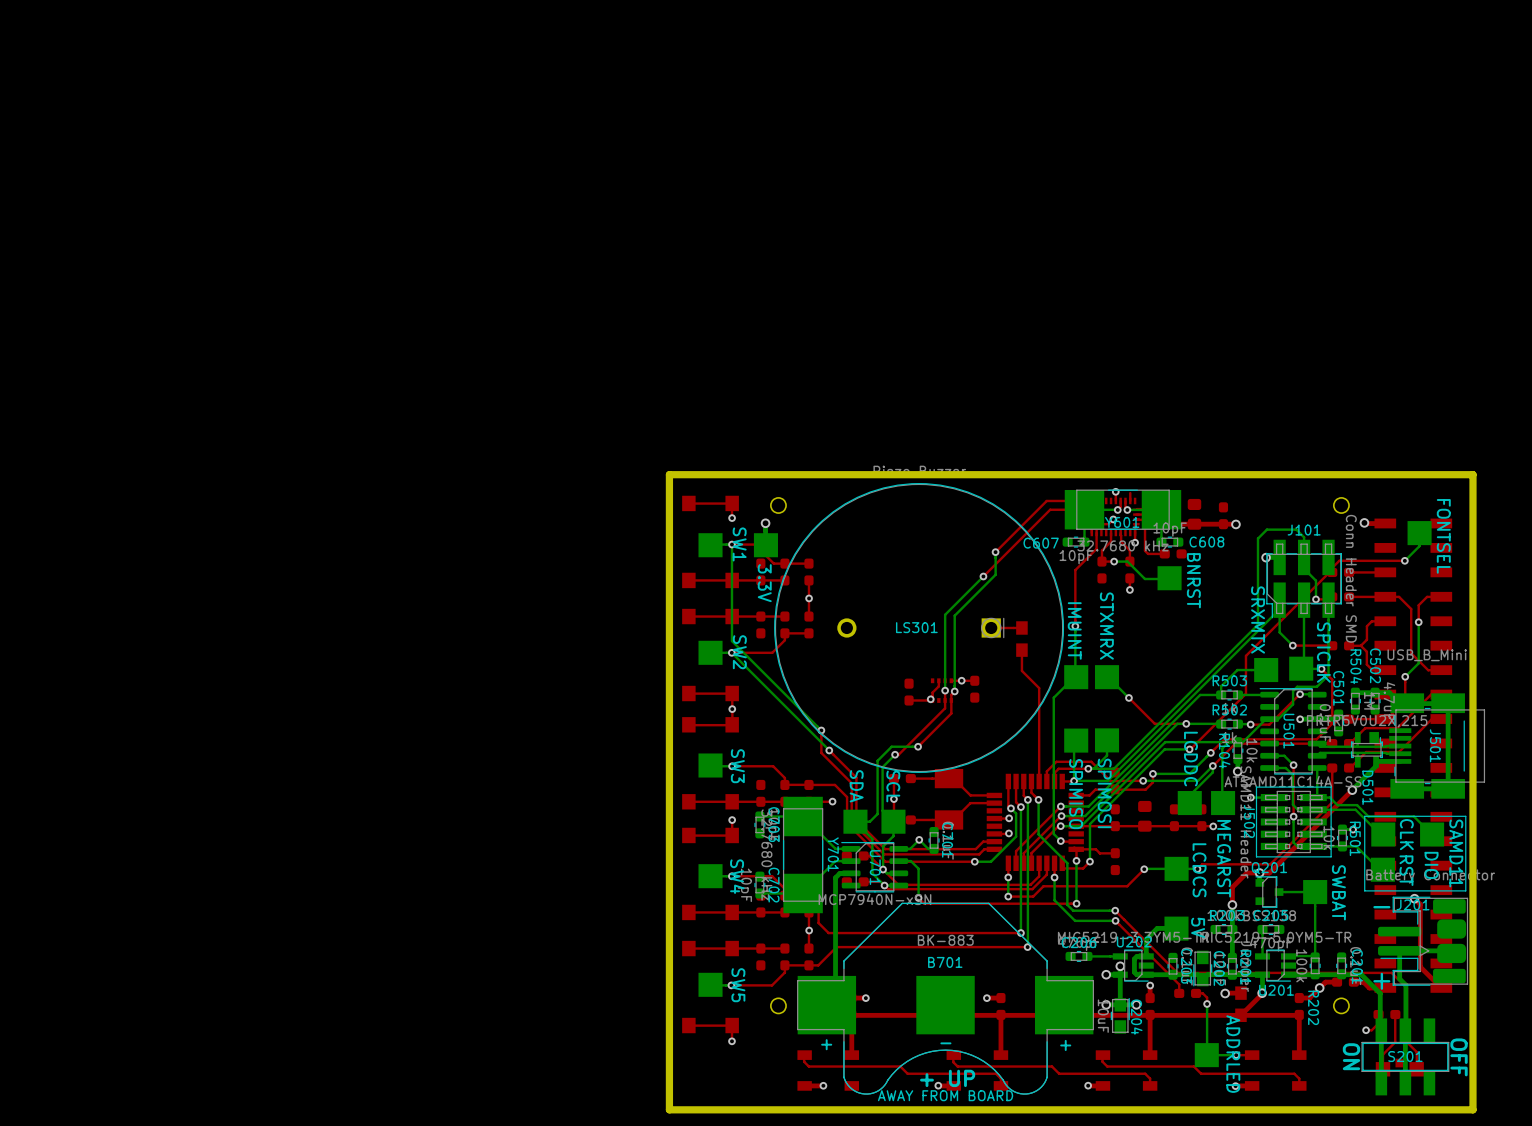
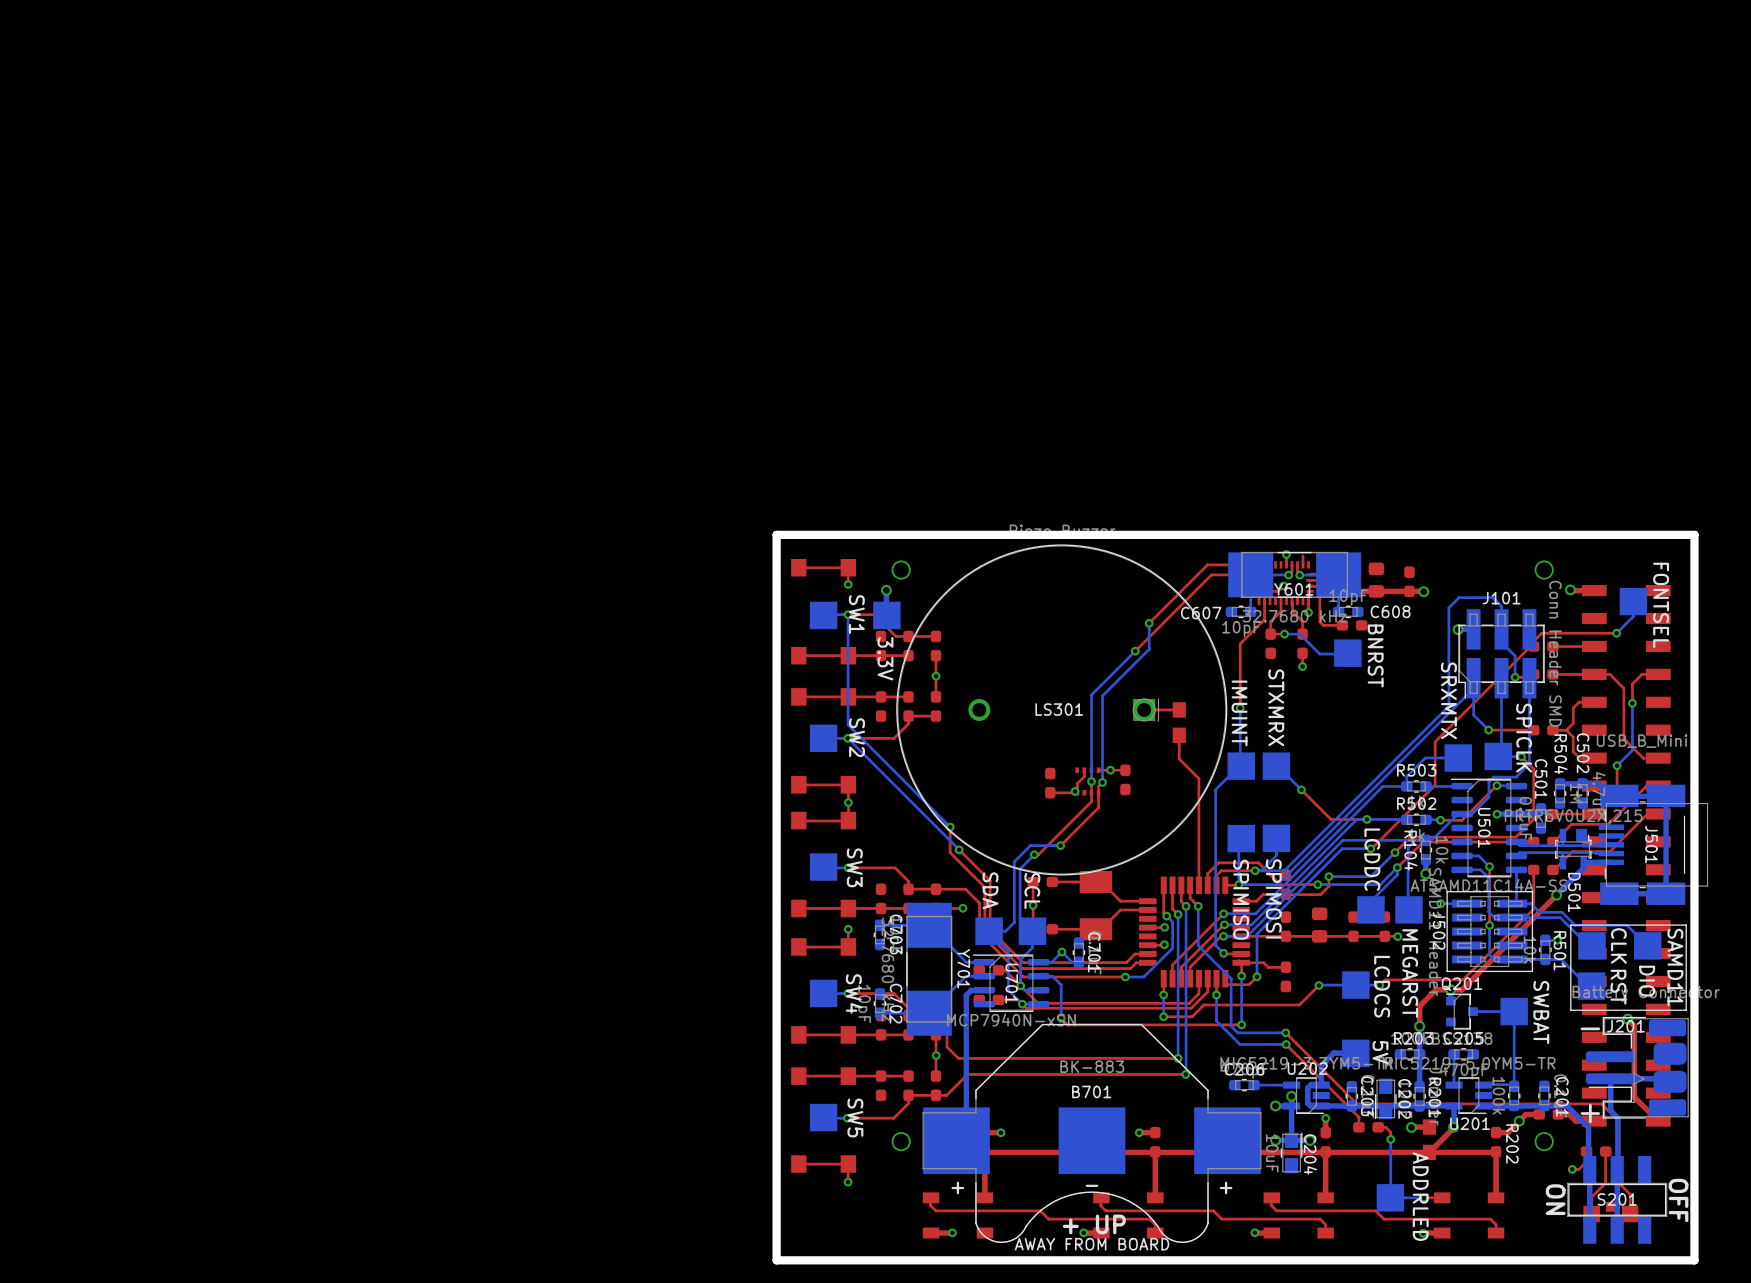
drawing: [821, 1039, 833, 1051] -> none
drawing: [940, 1042, 952, 1045] -> none
B701 text: none -> - (1091, 1185)
text: + (1065, 1045) -> none
B701 text: none -> + (957, 1188)
B701 text: none -> + (1226, 1188)

